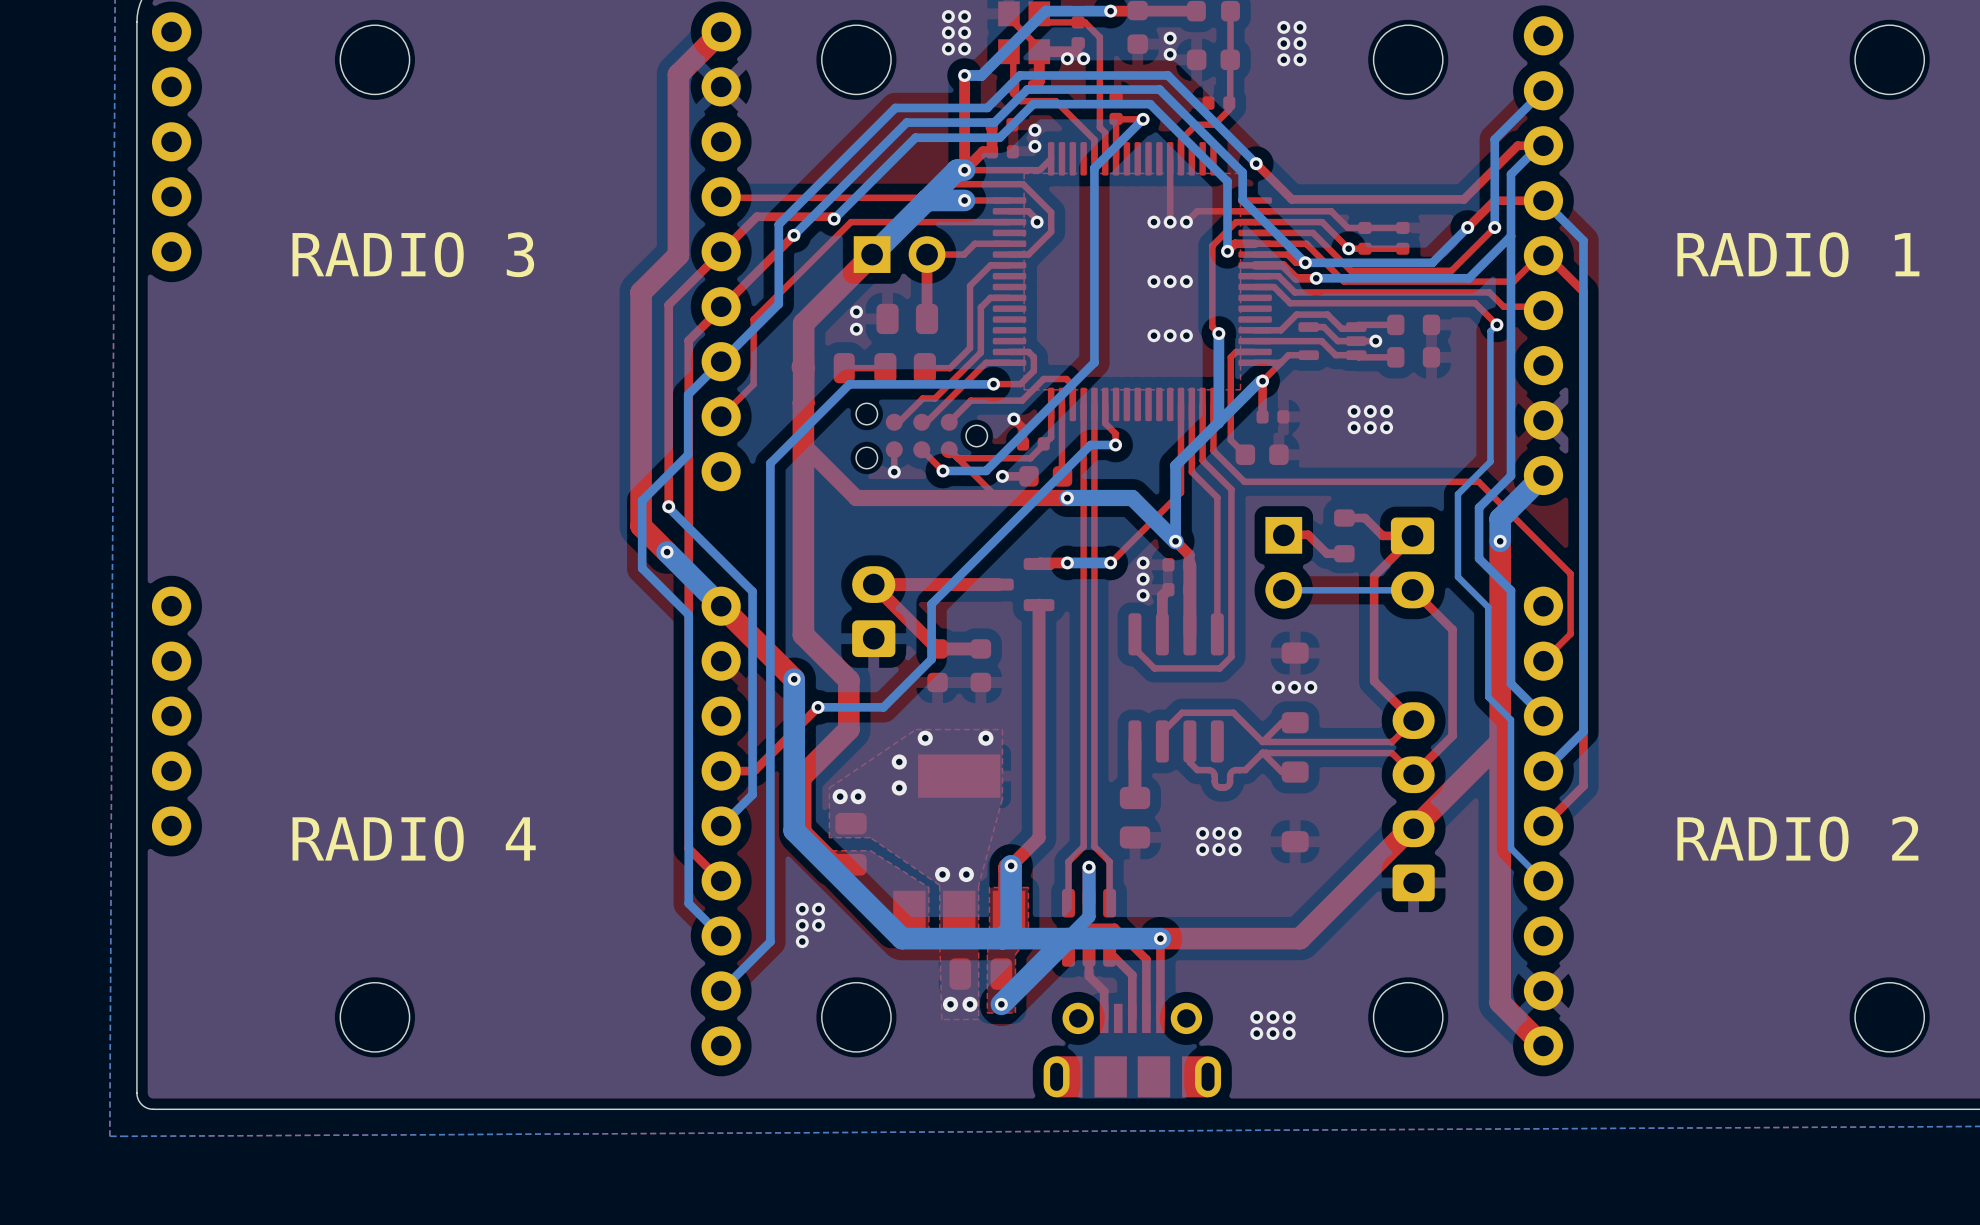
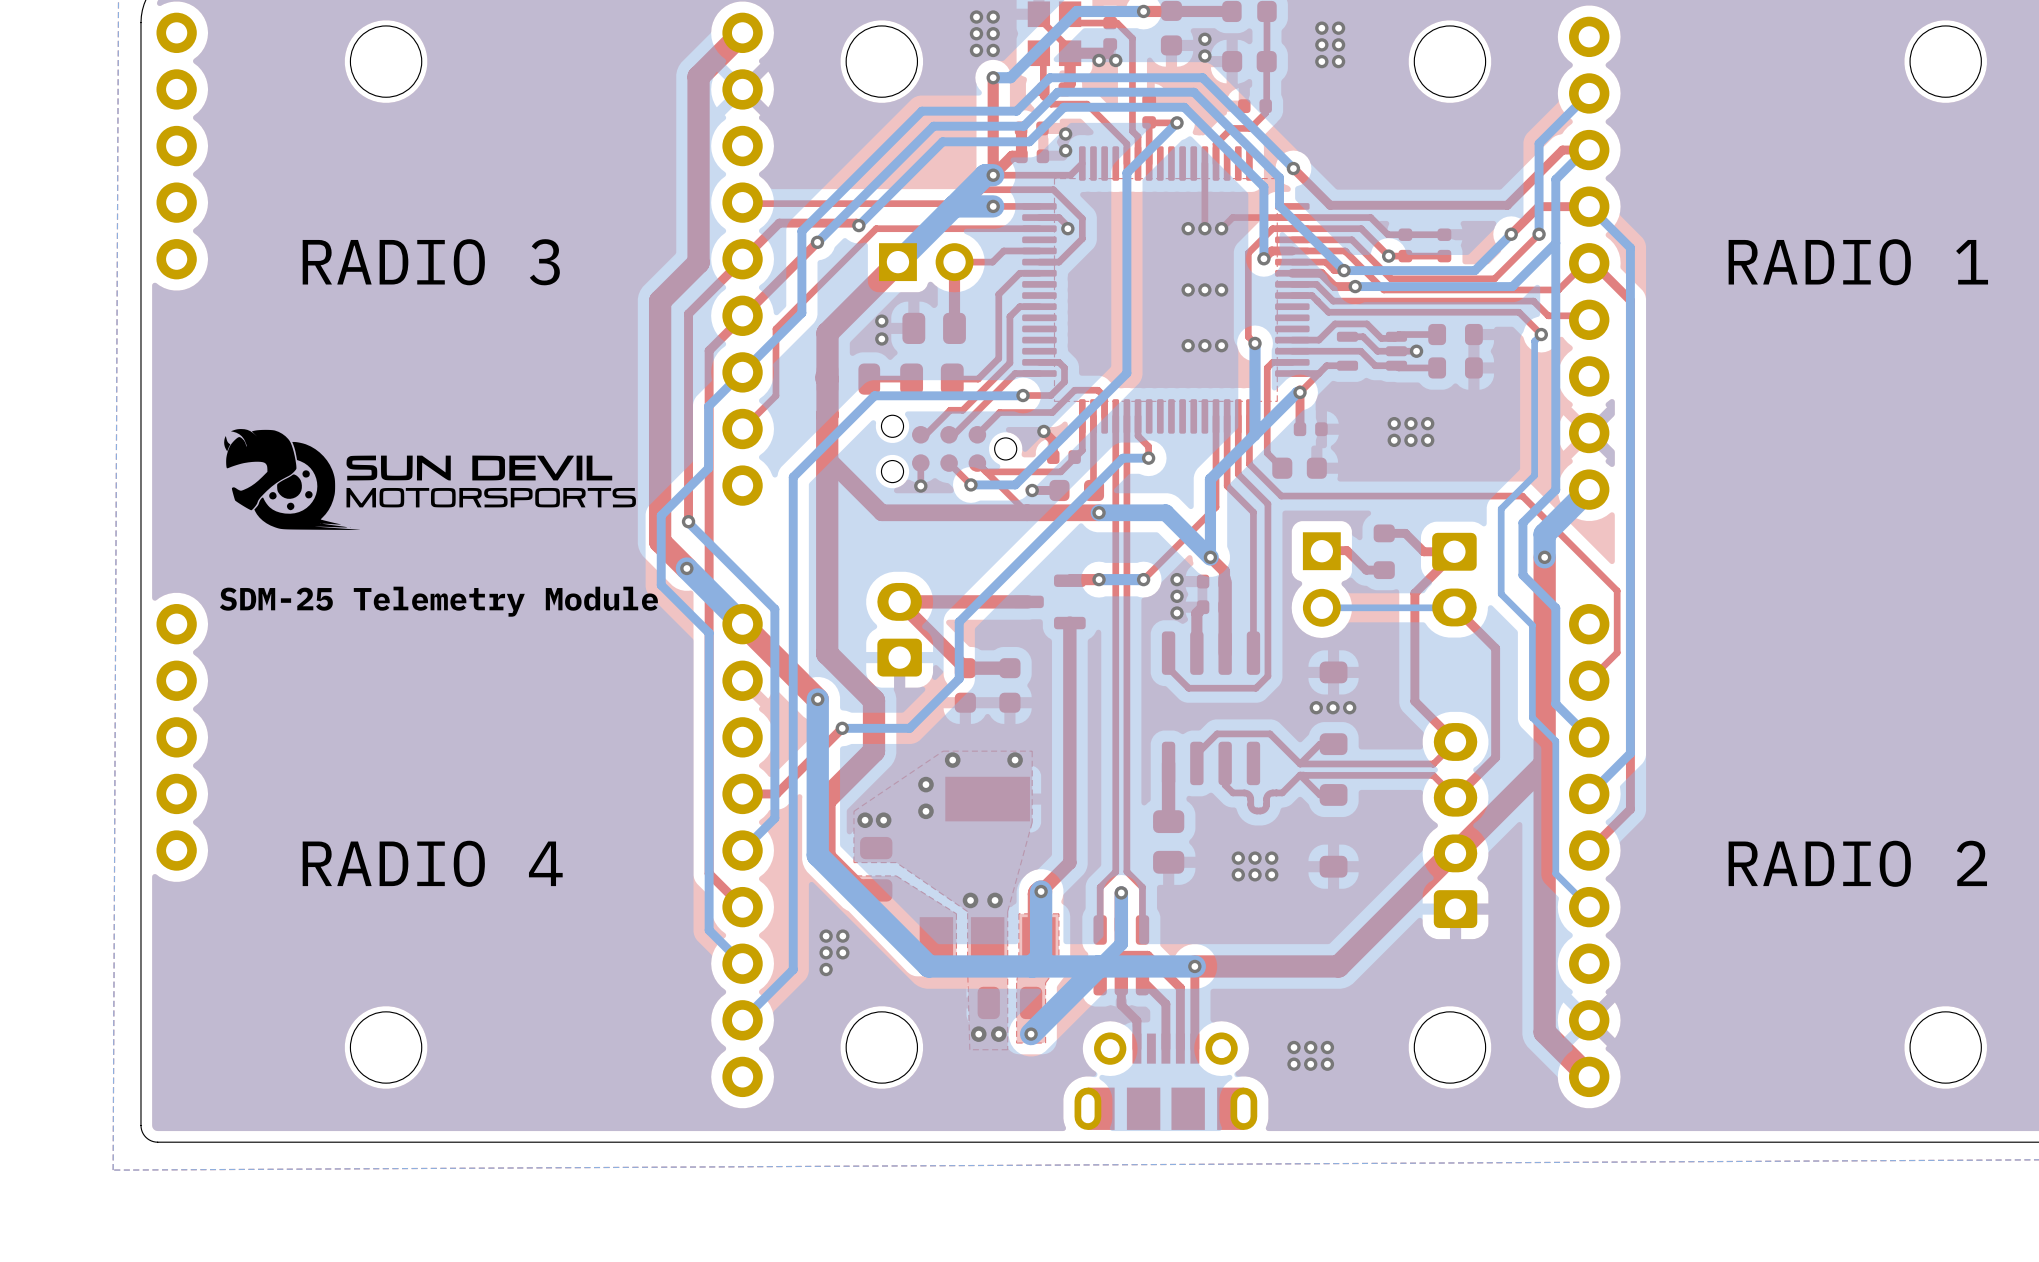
drawing: none -> [224, 429, 636, 530]
text: none -> SDM-25 Telemetry Module (438, 601)

